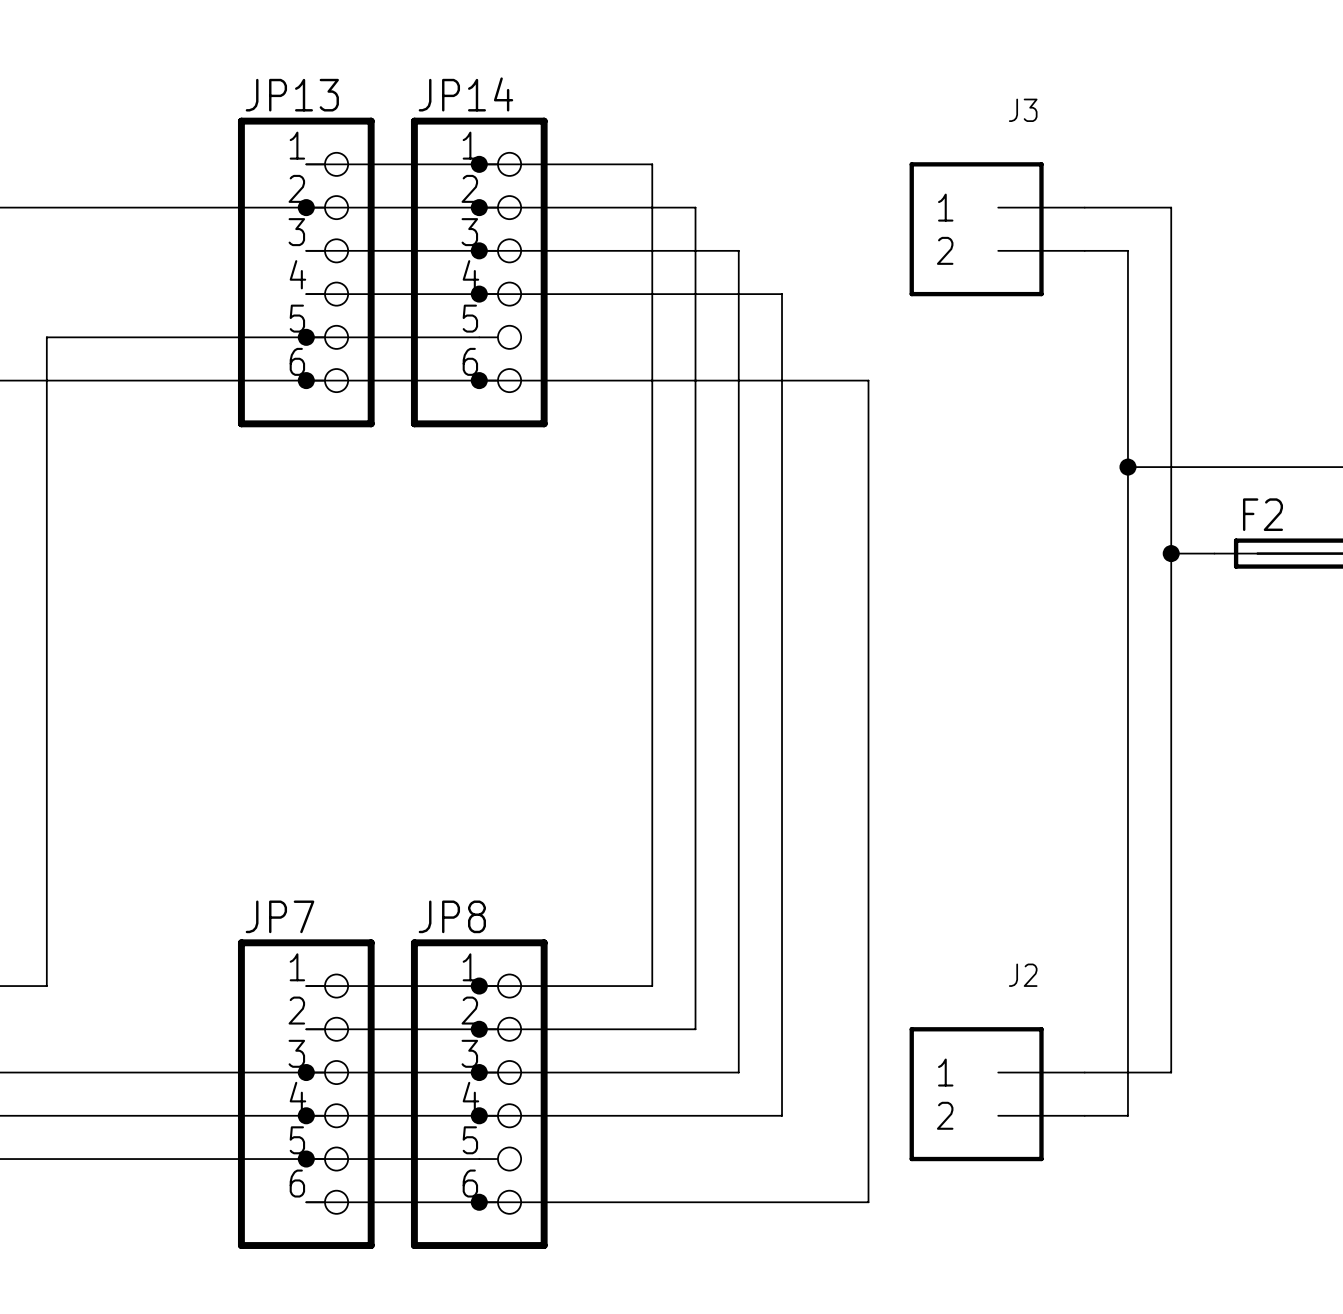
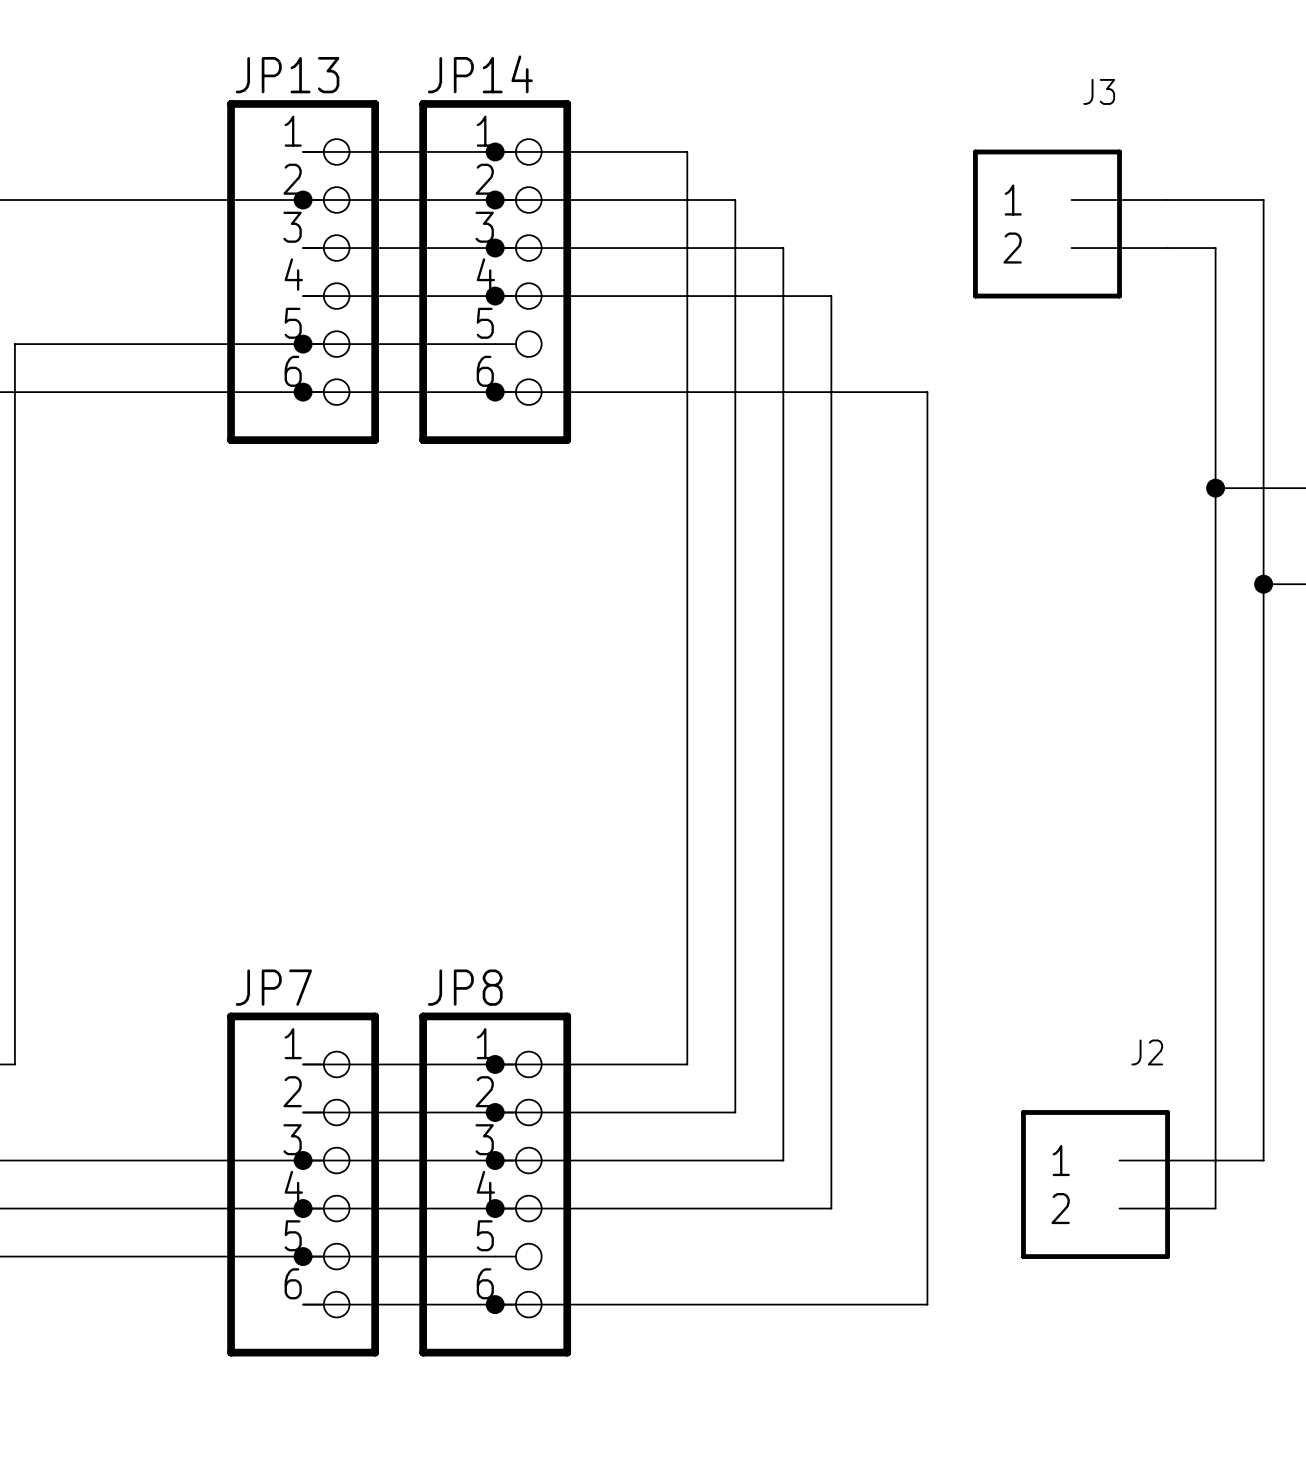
J2 position: (997, 1094) -> (1118, 1184)

